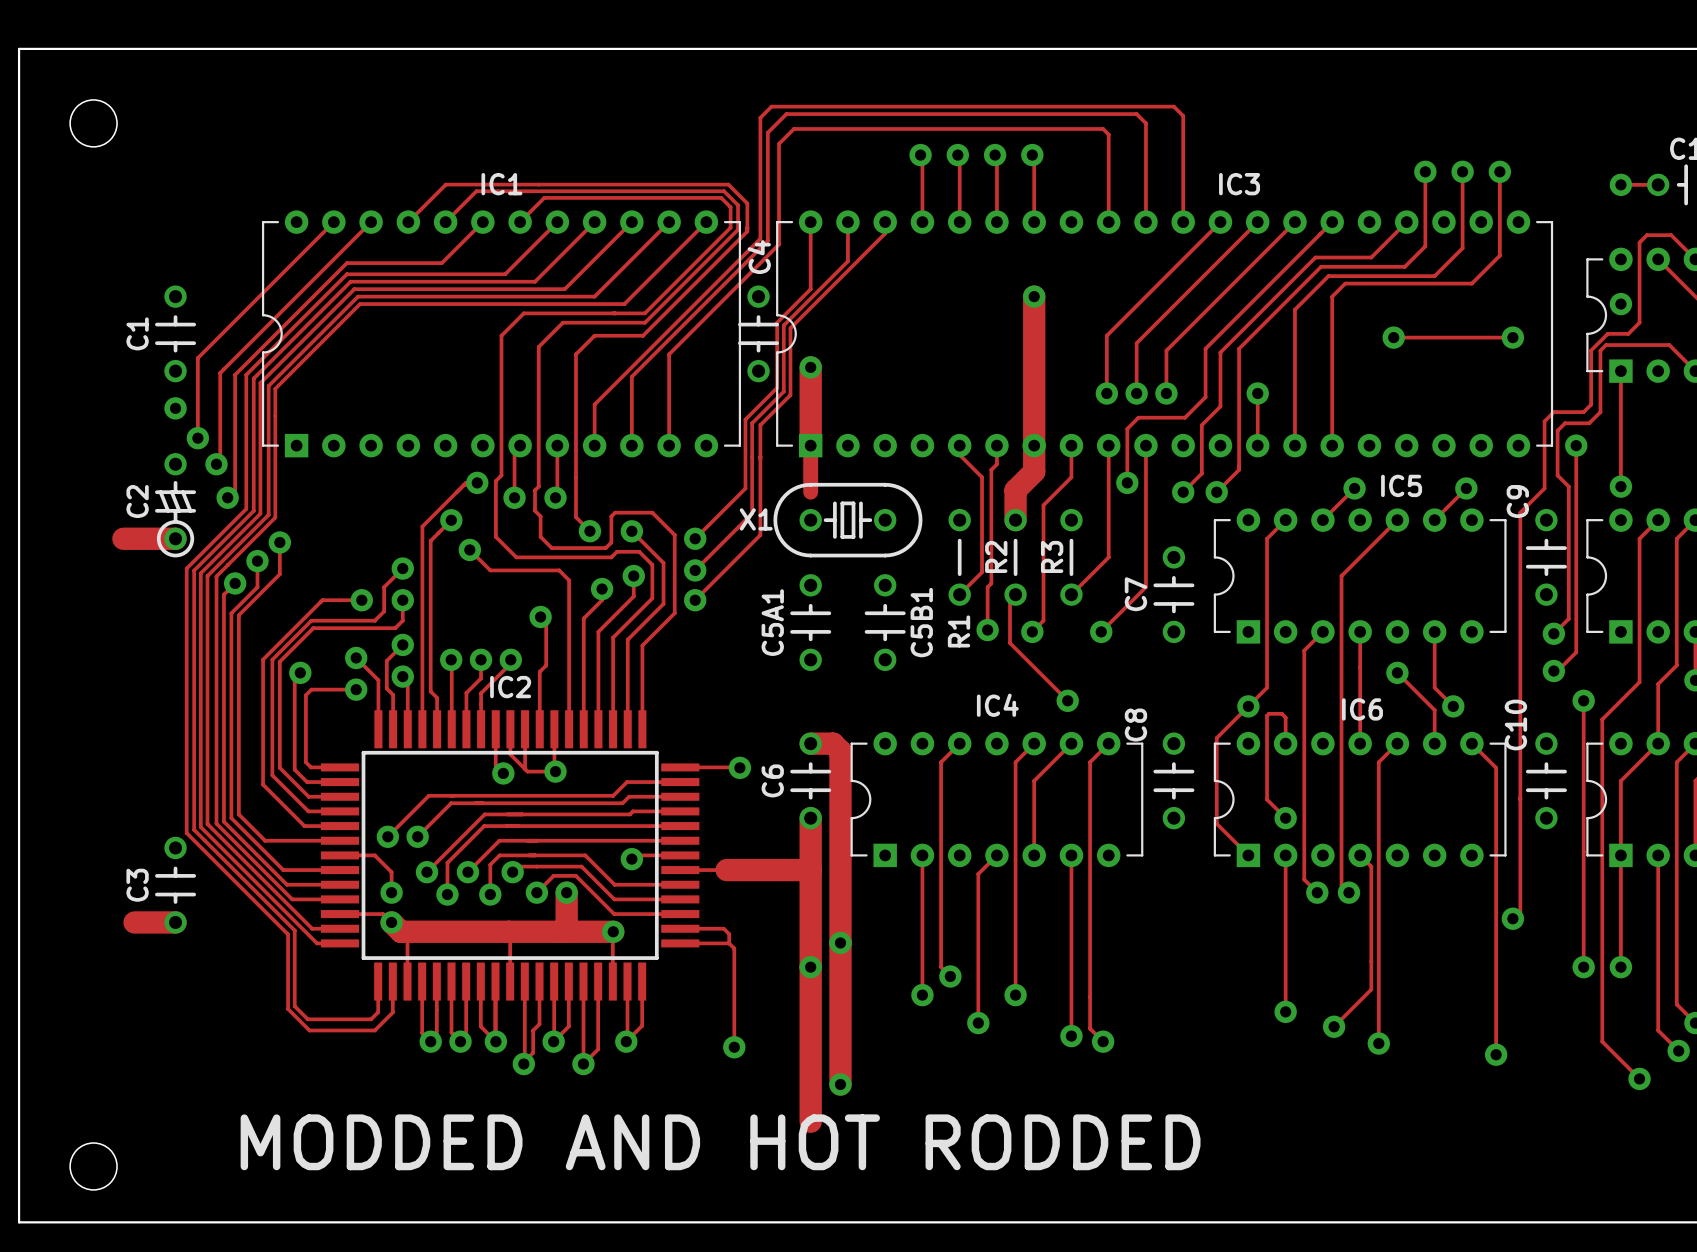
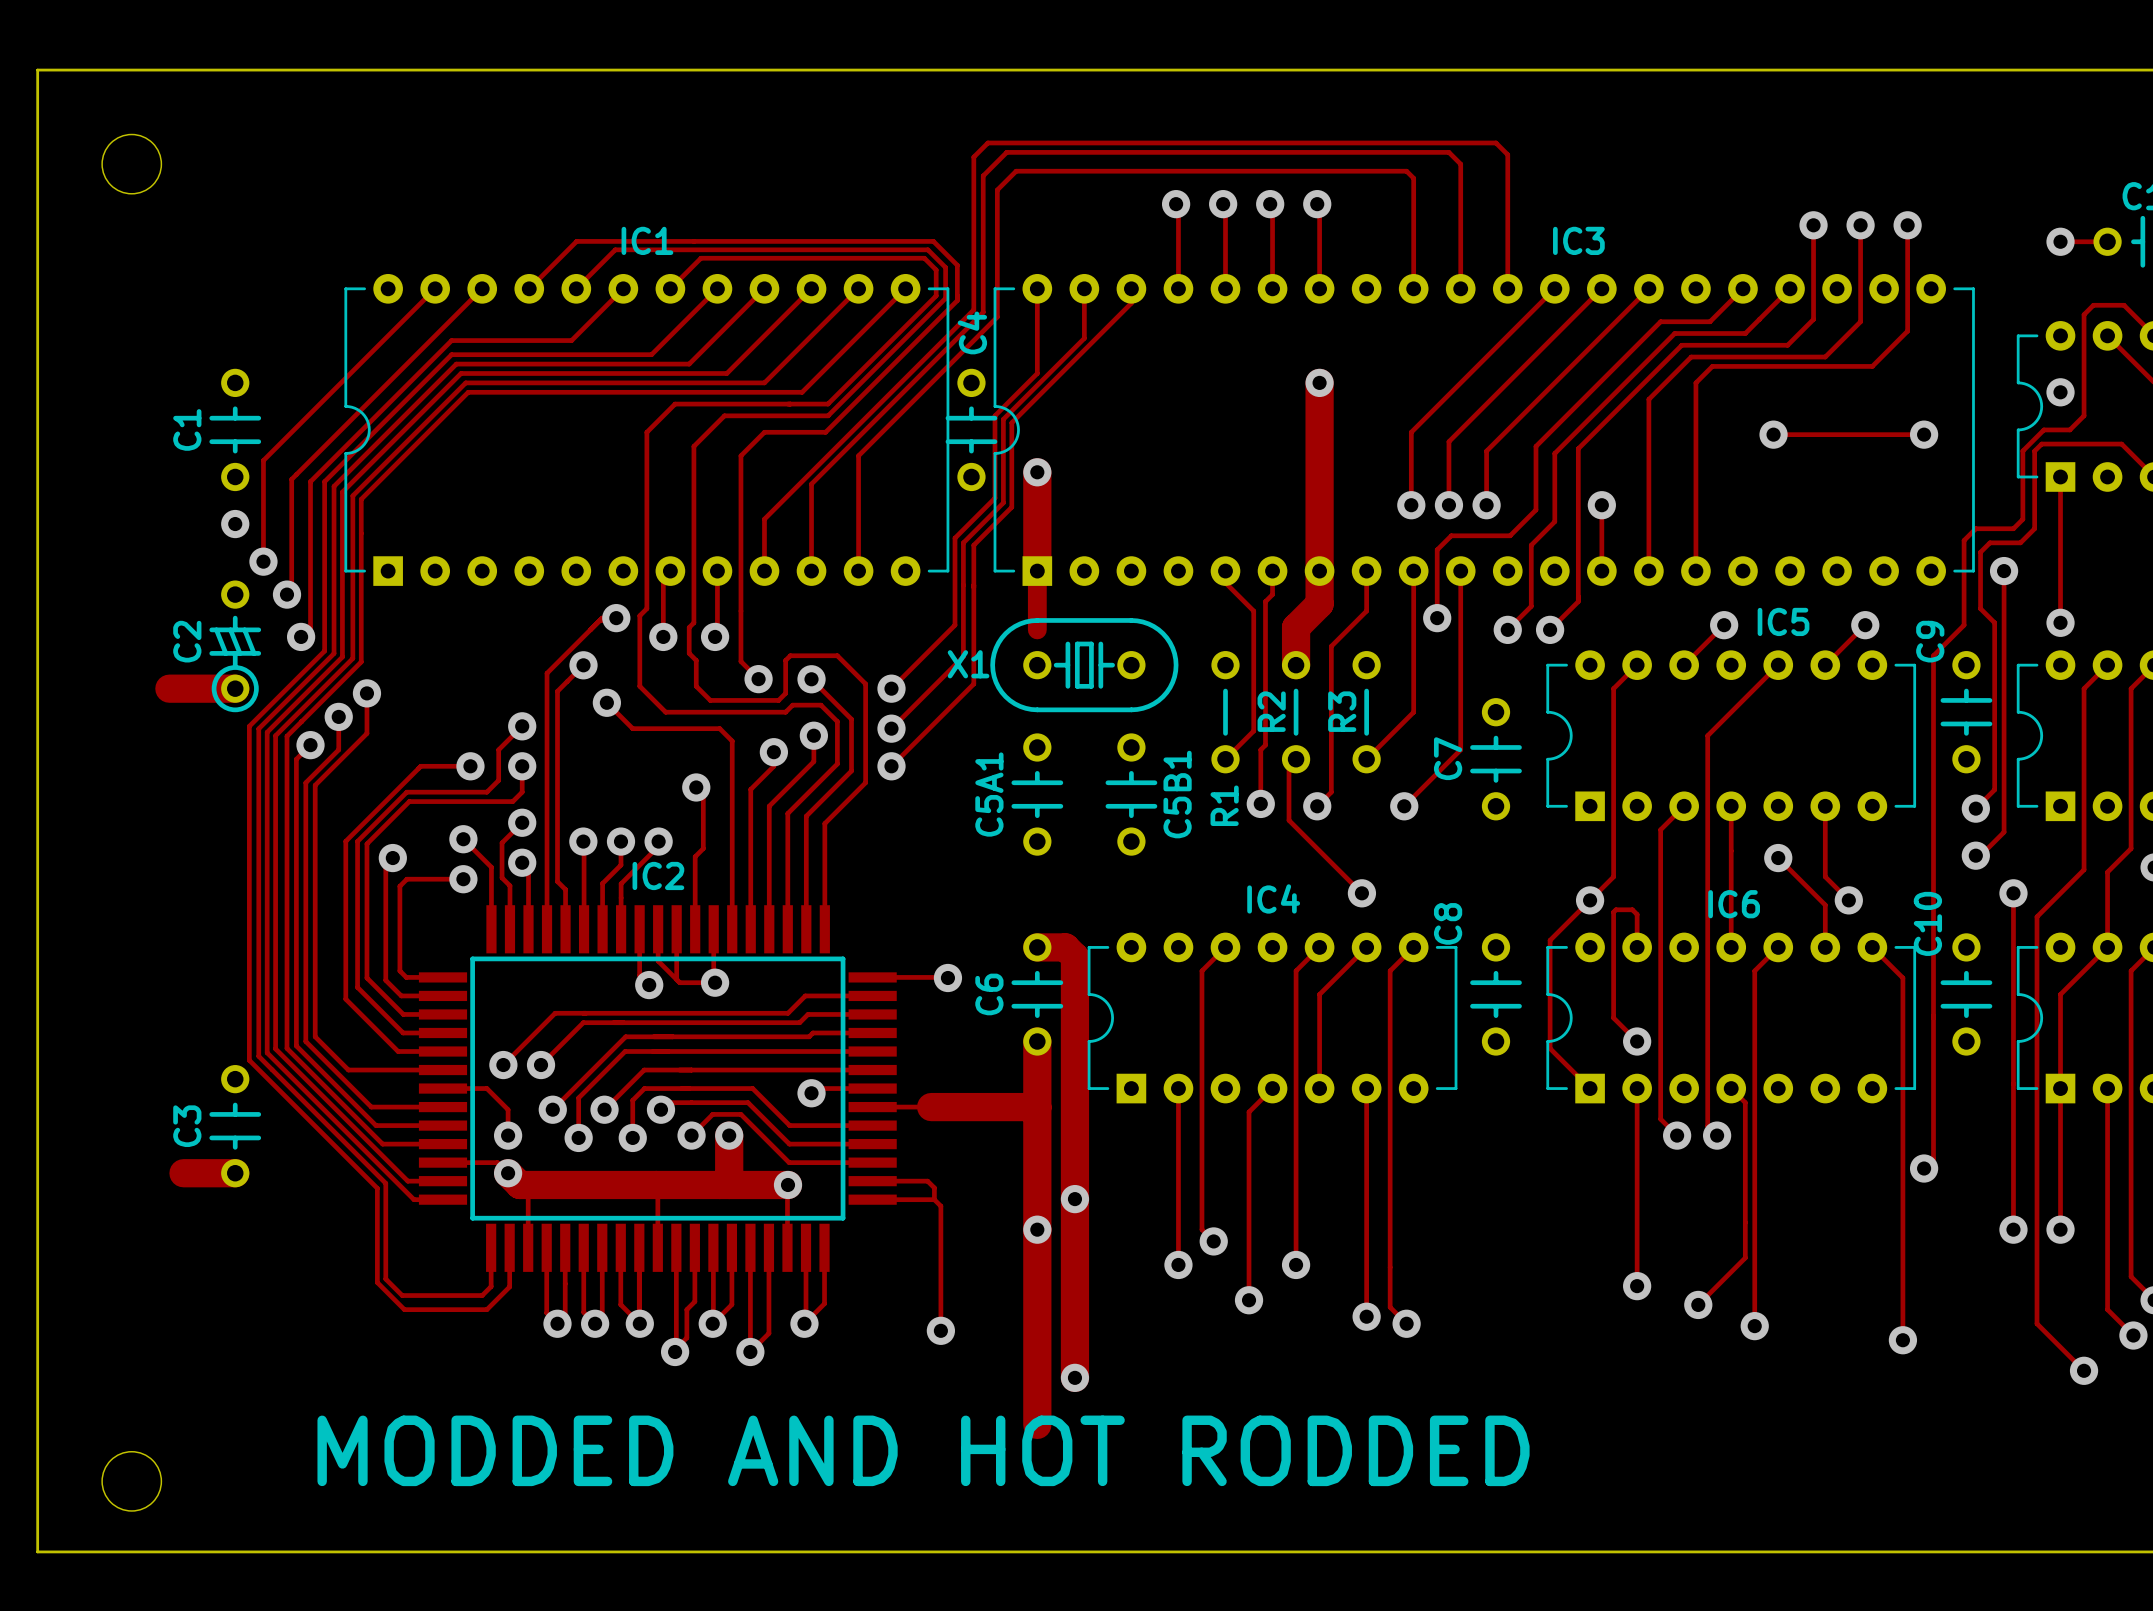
track: (1332, 222) (1205, 348) -> (1742, 288) (1710, 321) (1660, 321) (1535, 446) (1535, 448)

